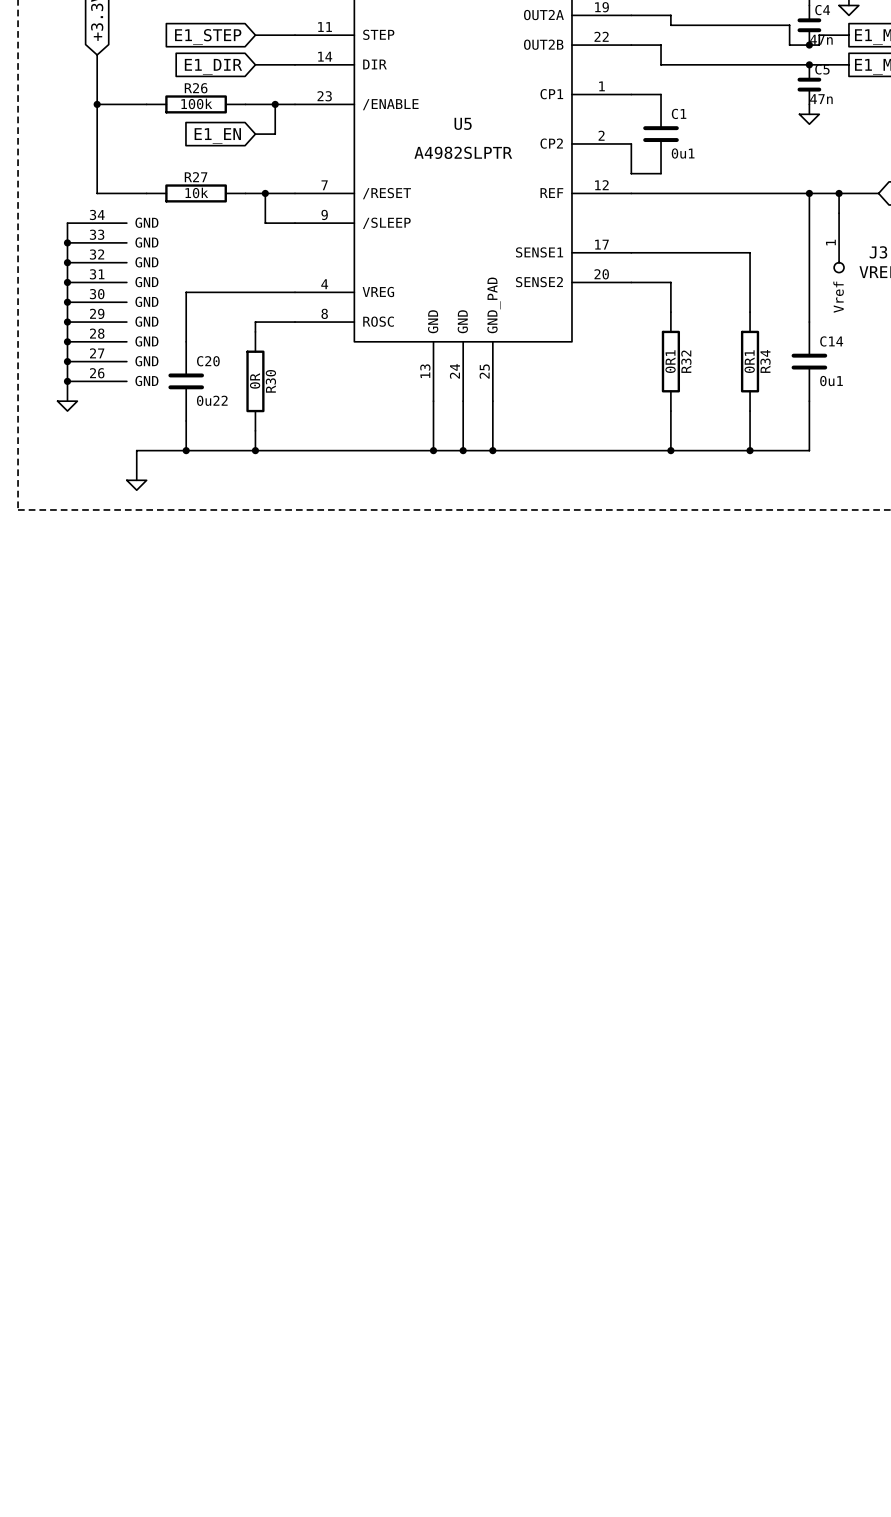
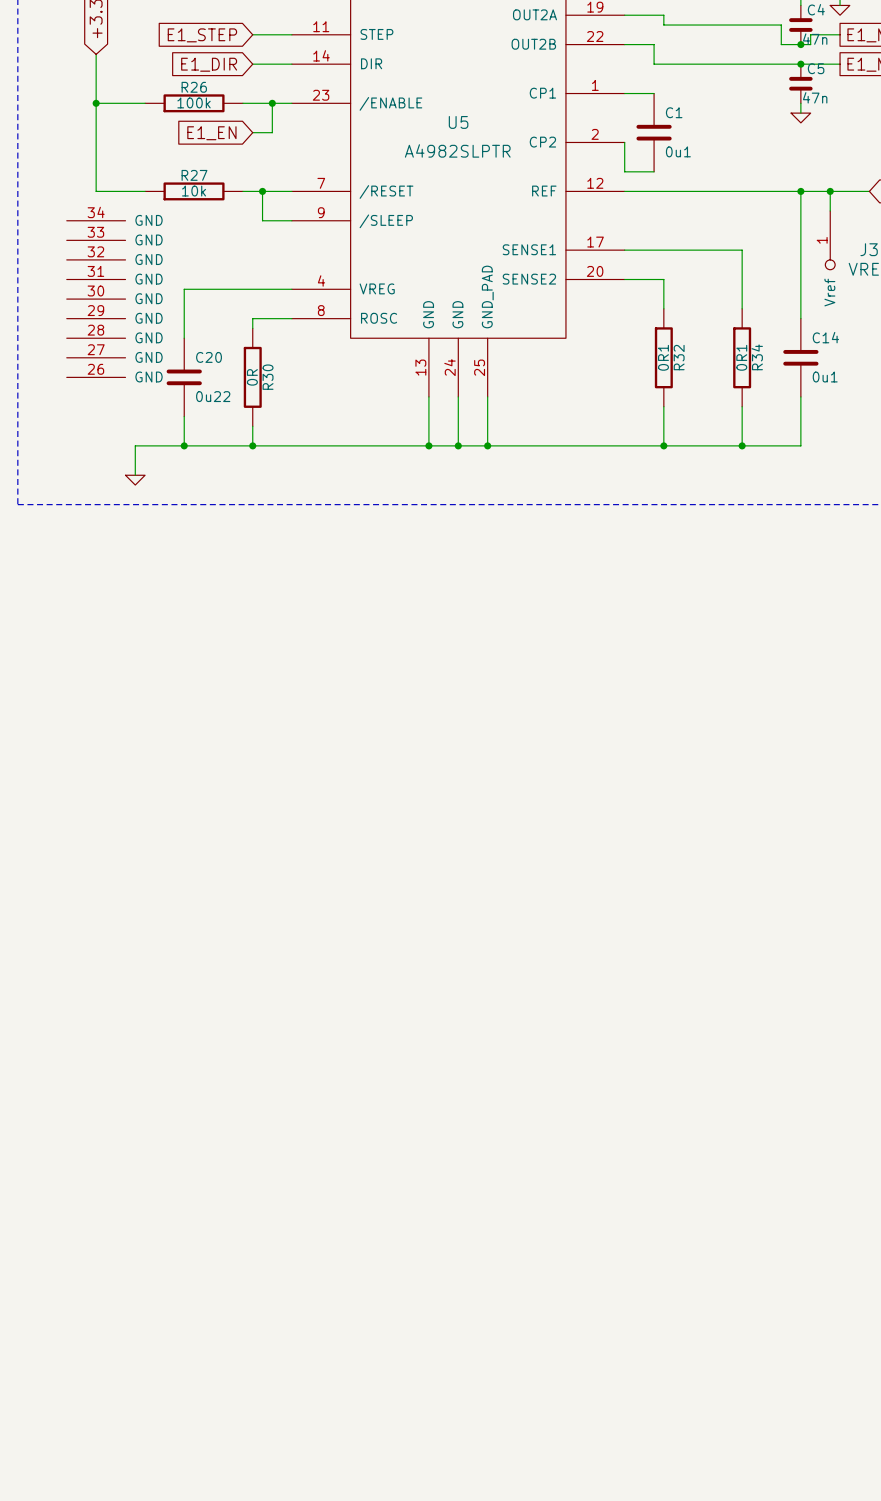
wire: (67, 223) (67, 401) -> none
junction: (67, 242) -> none
junction: (67, 262) -> none
junction: (67, 282) -> none
junction: (67, 302) -> none
junction: (67, 322) -> none
junction: (67, 341) -> none
junction: (67, 361) -> none
junction: (67, 381) -> none
power symbol: (67, 406) -> none

